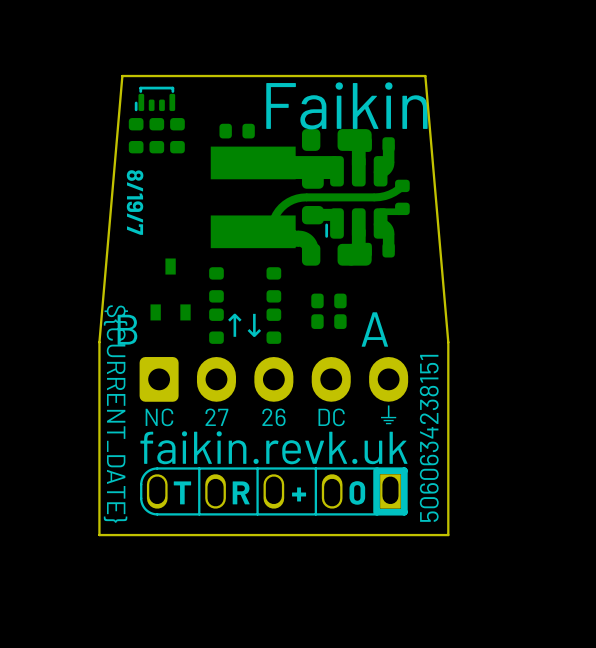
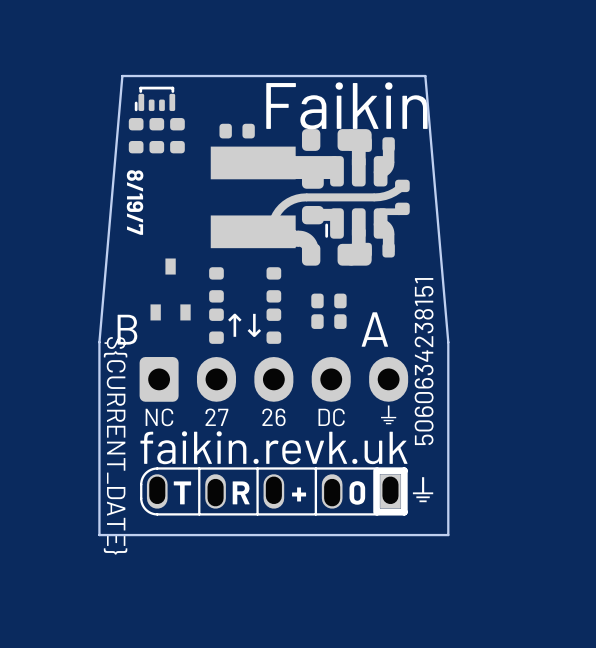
text position: ${CURRENT_DATE} (115, 414) -> ${CURRENT_DATE} (115, 445)
text position: 5060634238151 (429, 438) -> 5060634238151 (424, 361)
part text: none -> ⏚ (423, 489)

